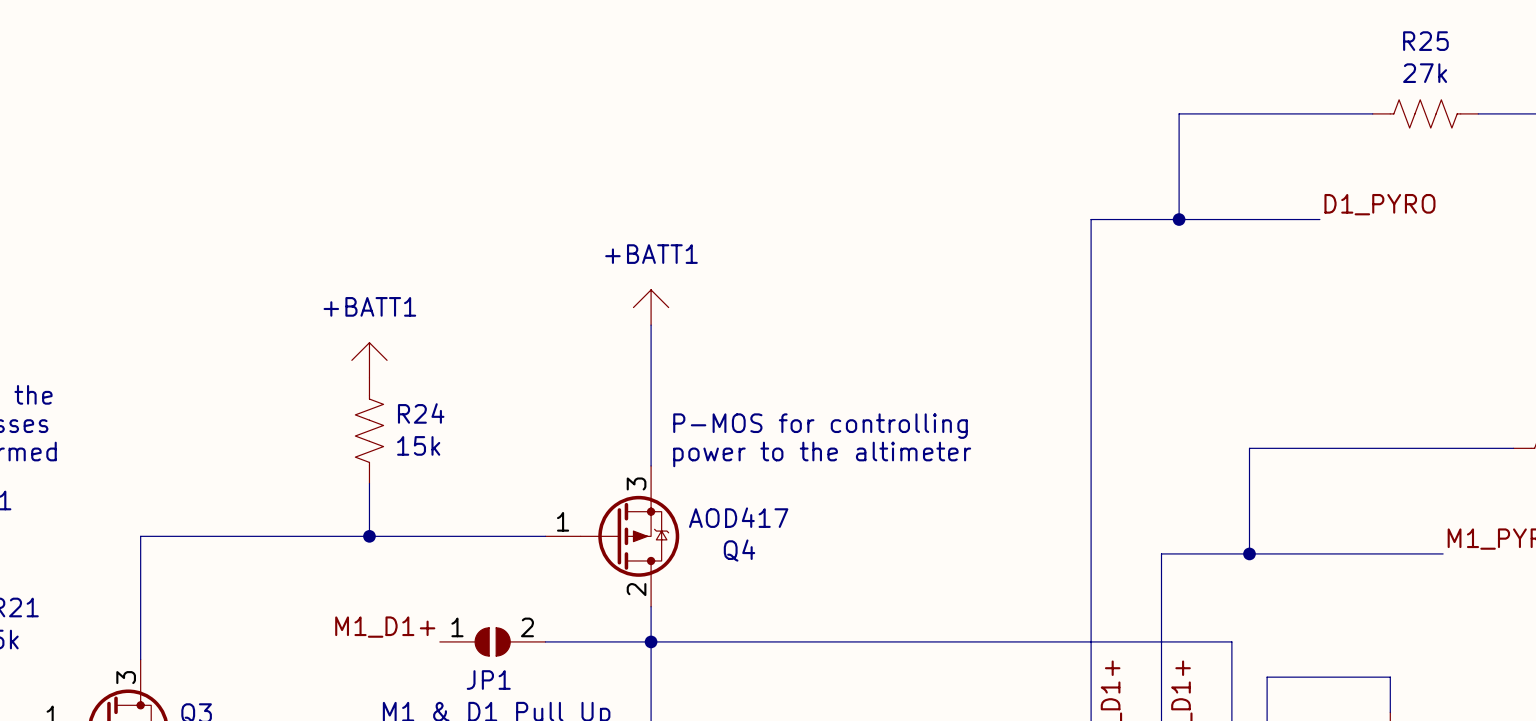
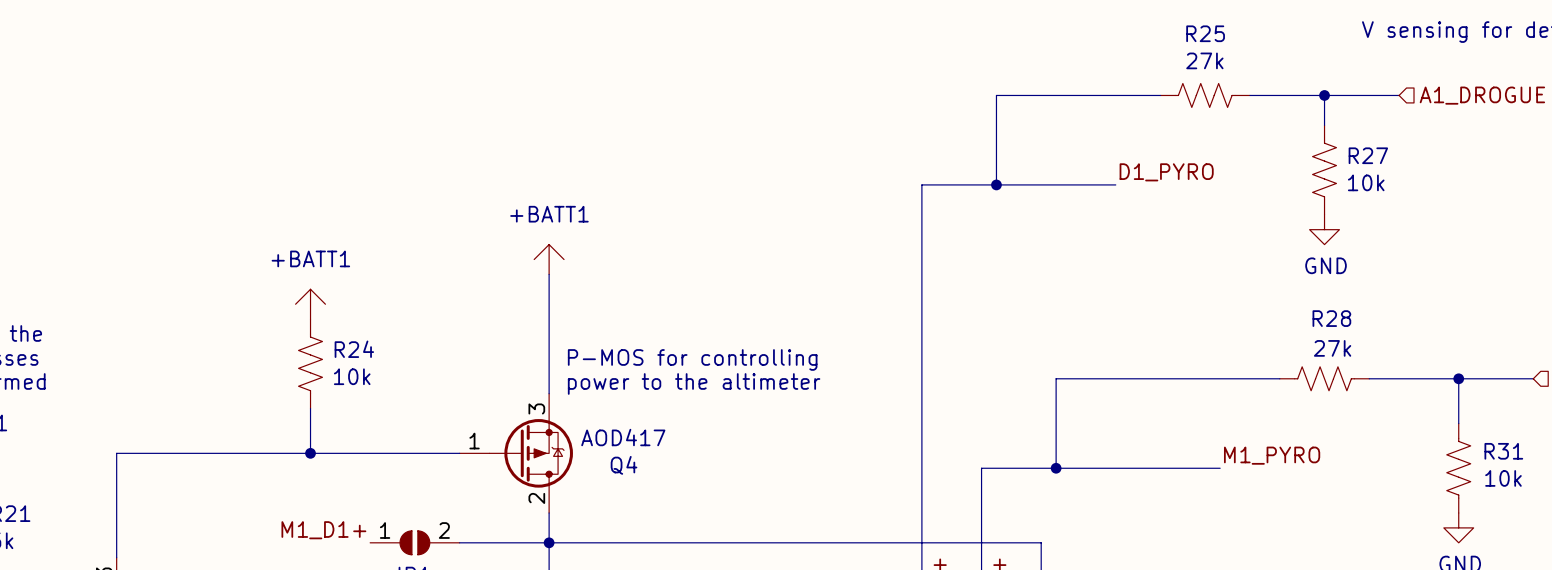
R24 value: 15k (418, 445) -> 10k (352, 376)

